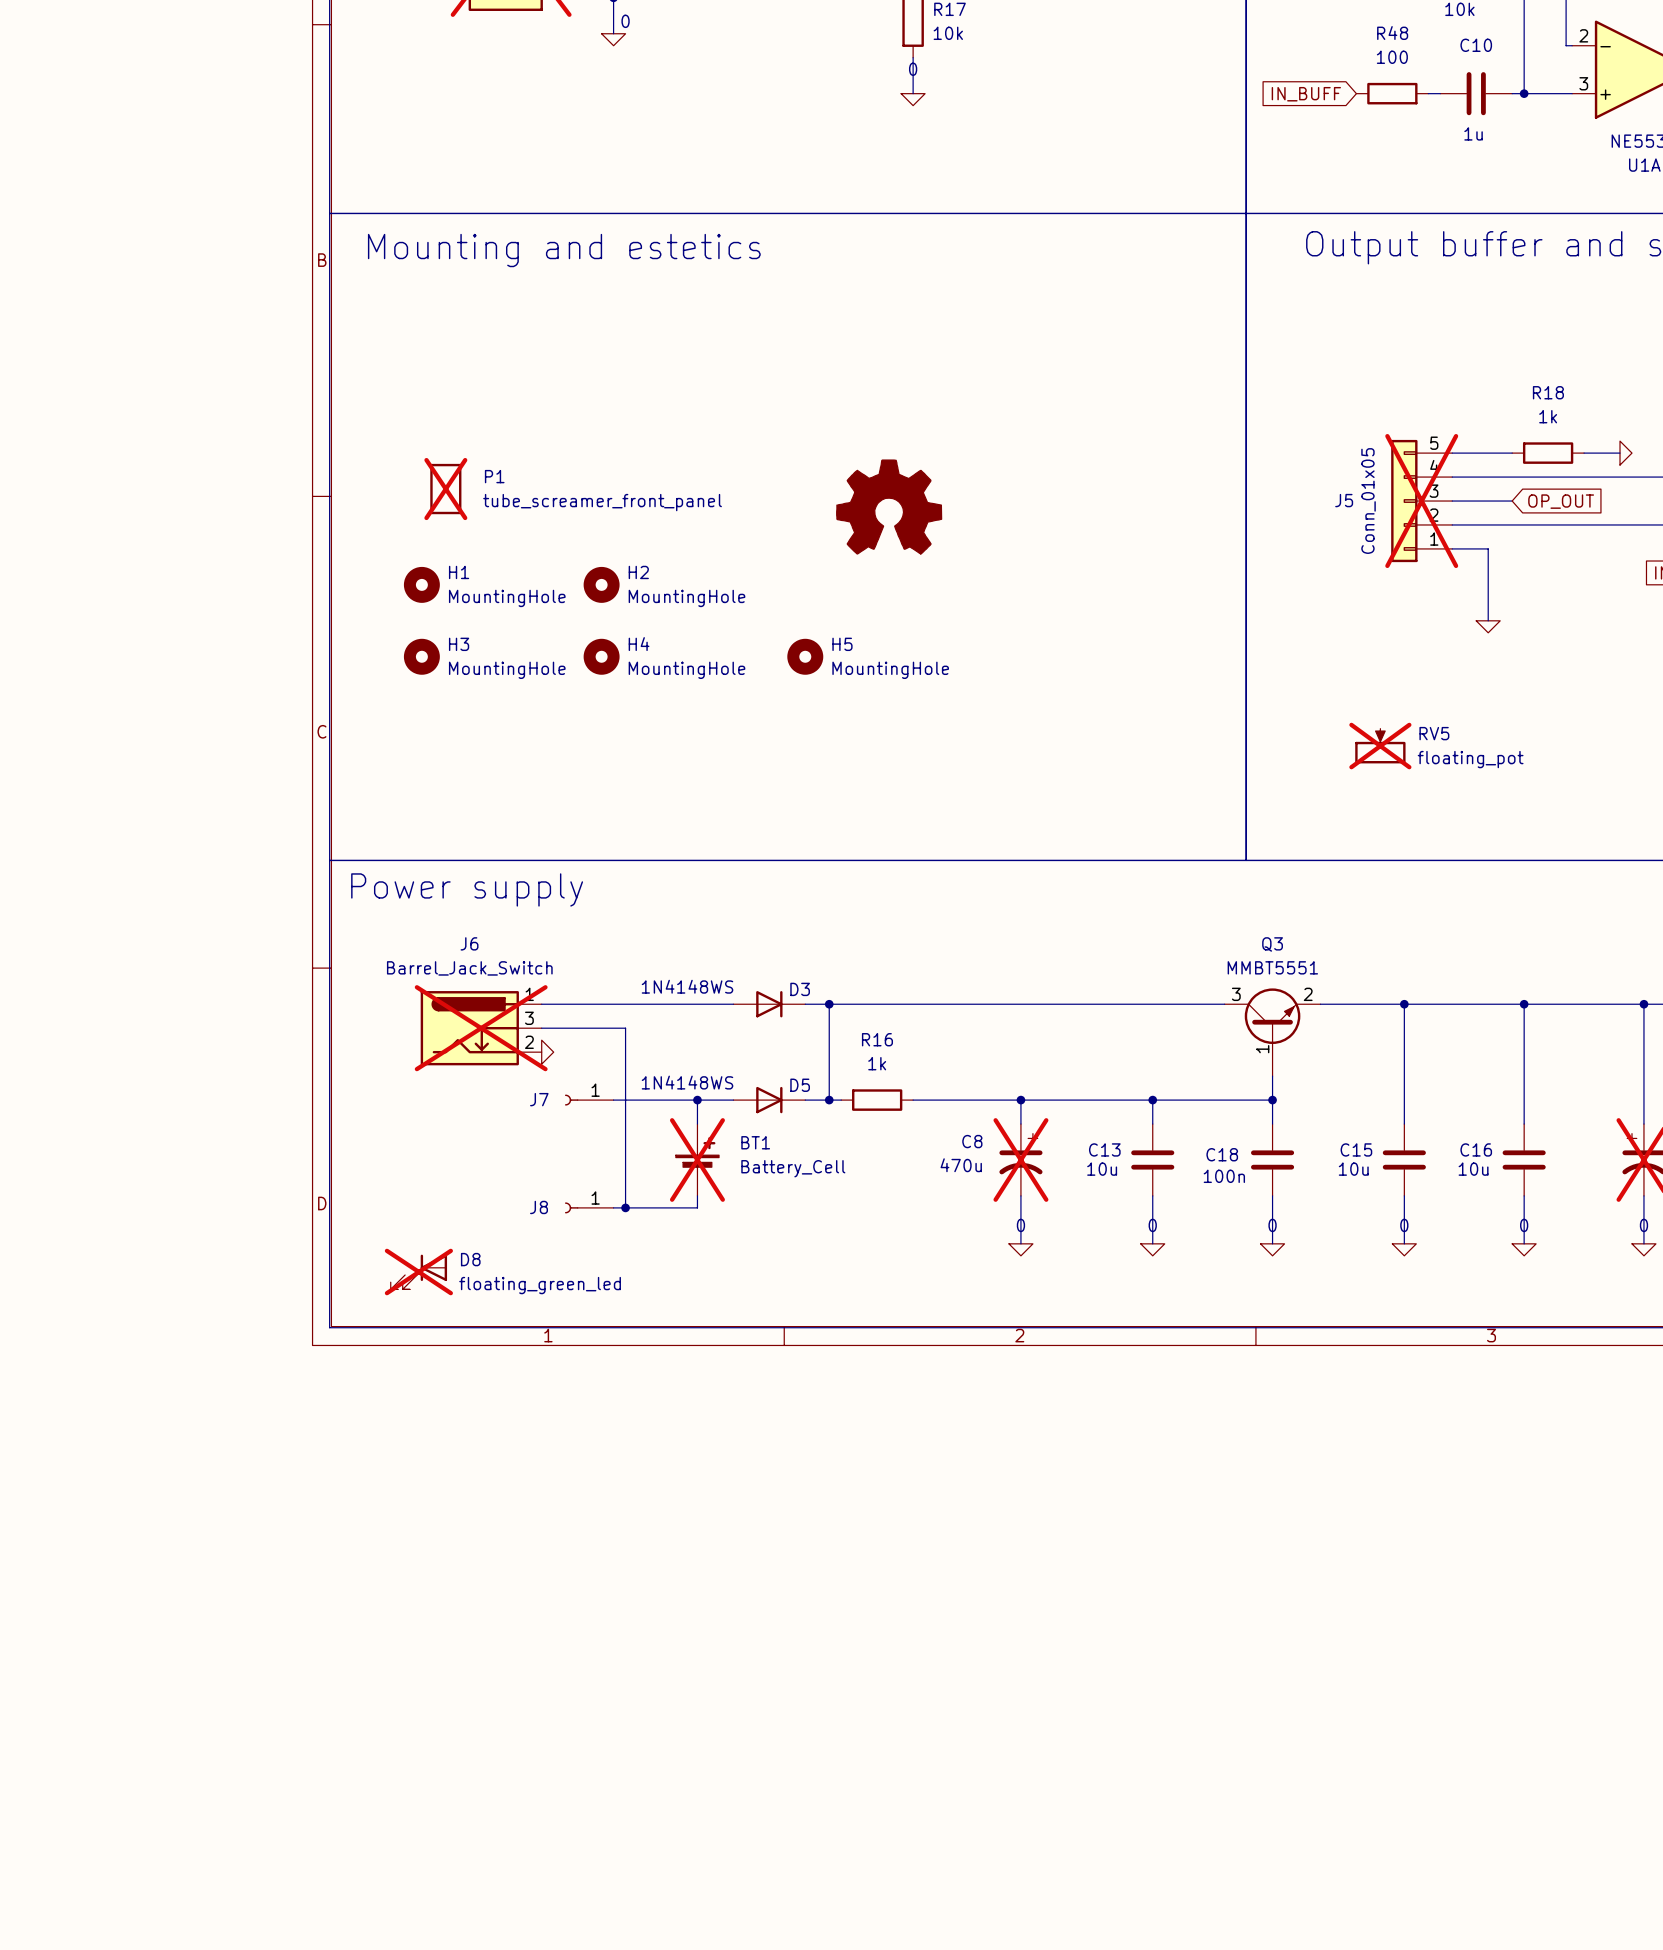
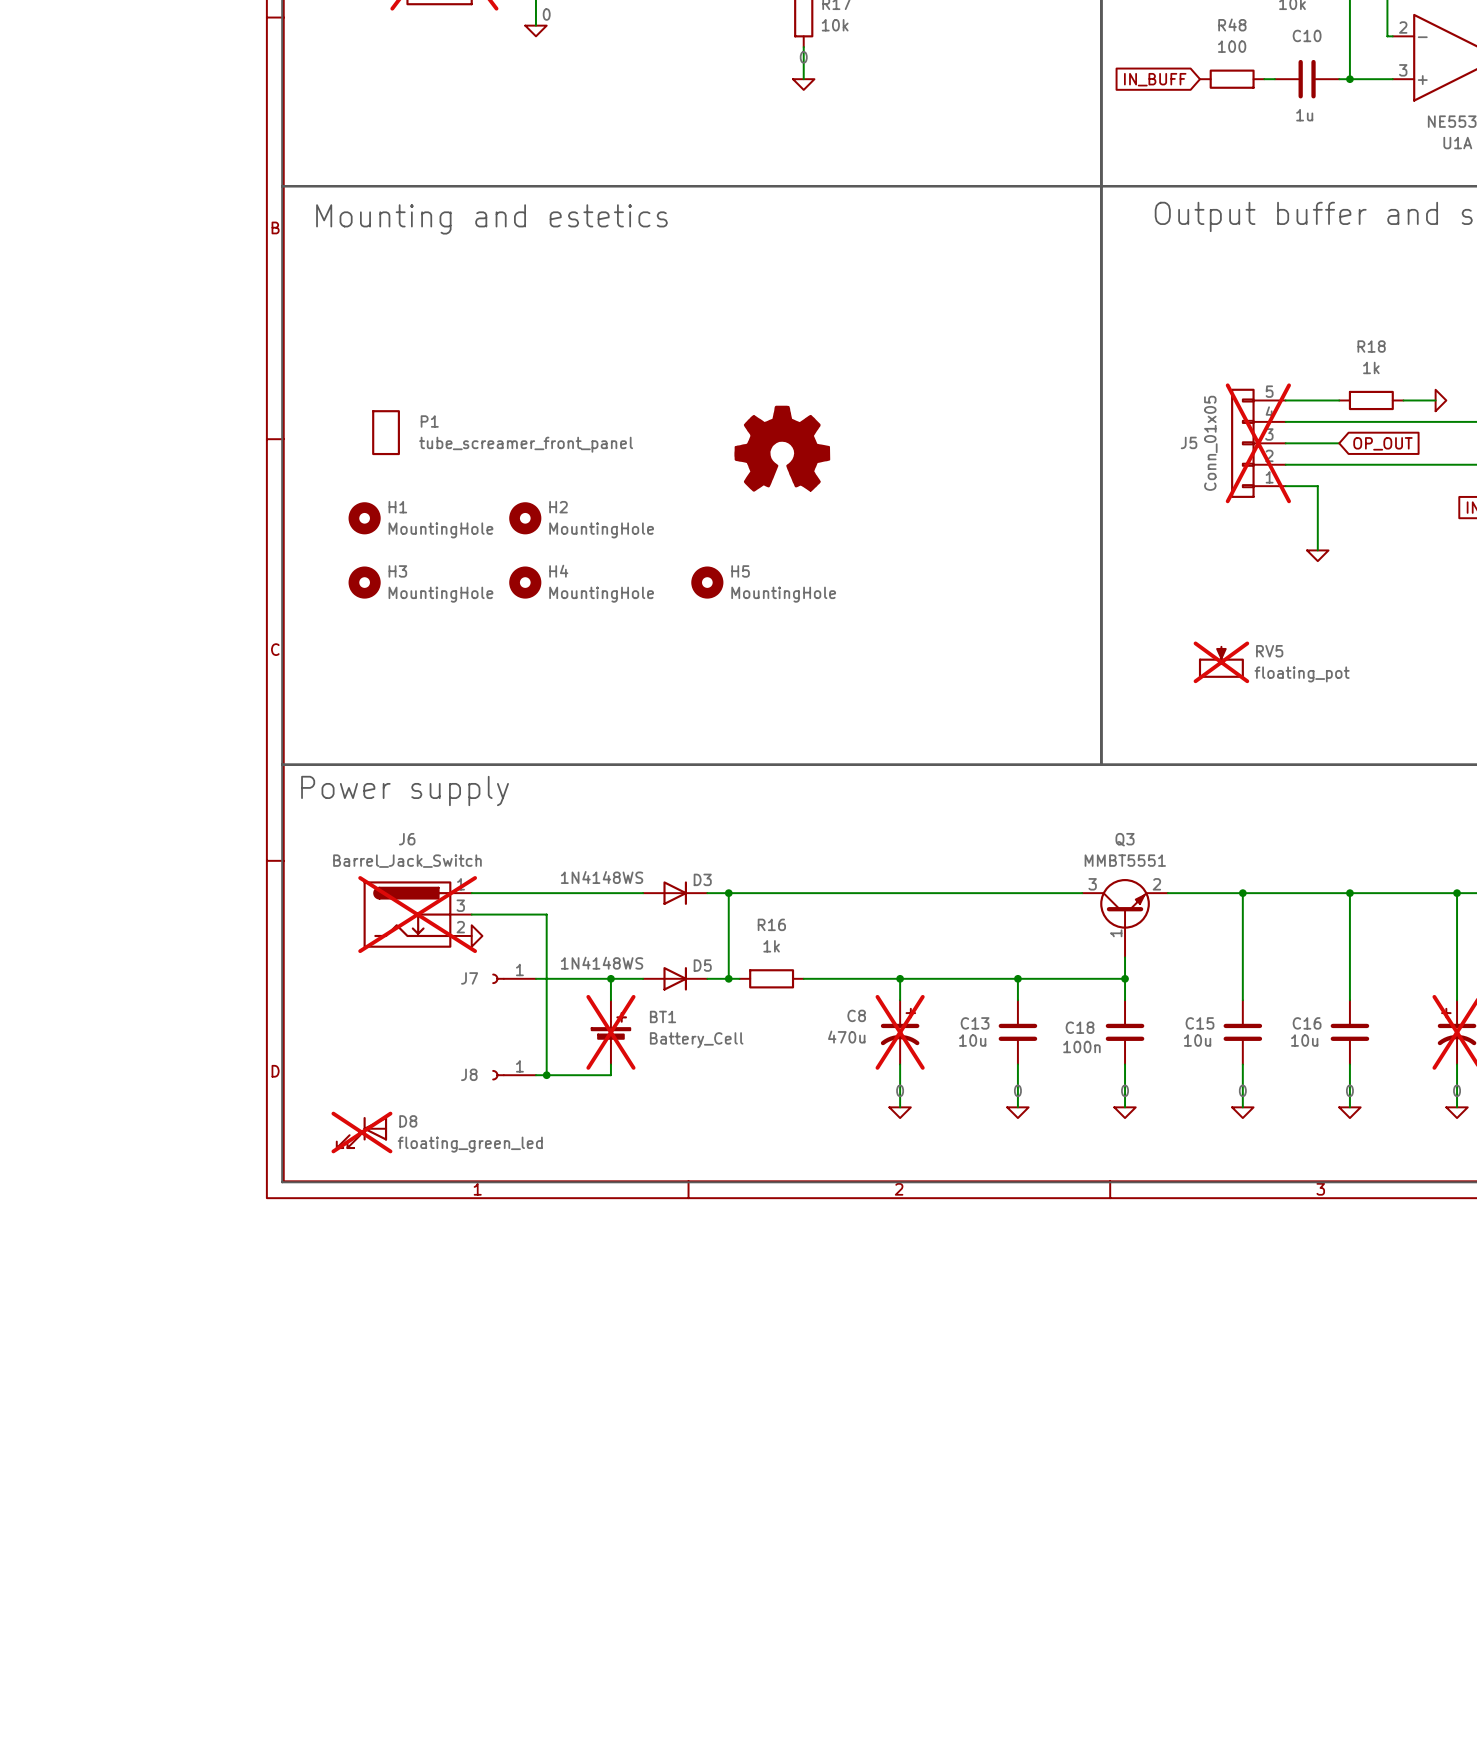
P1 do-not-place cross: (445, 489) -> none

